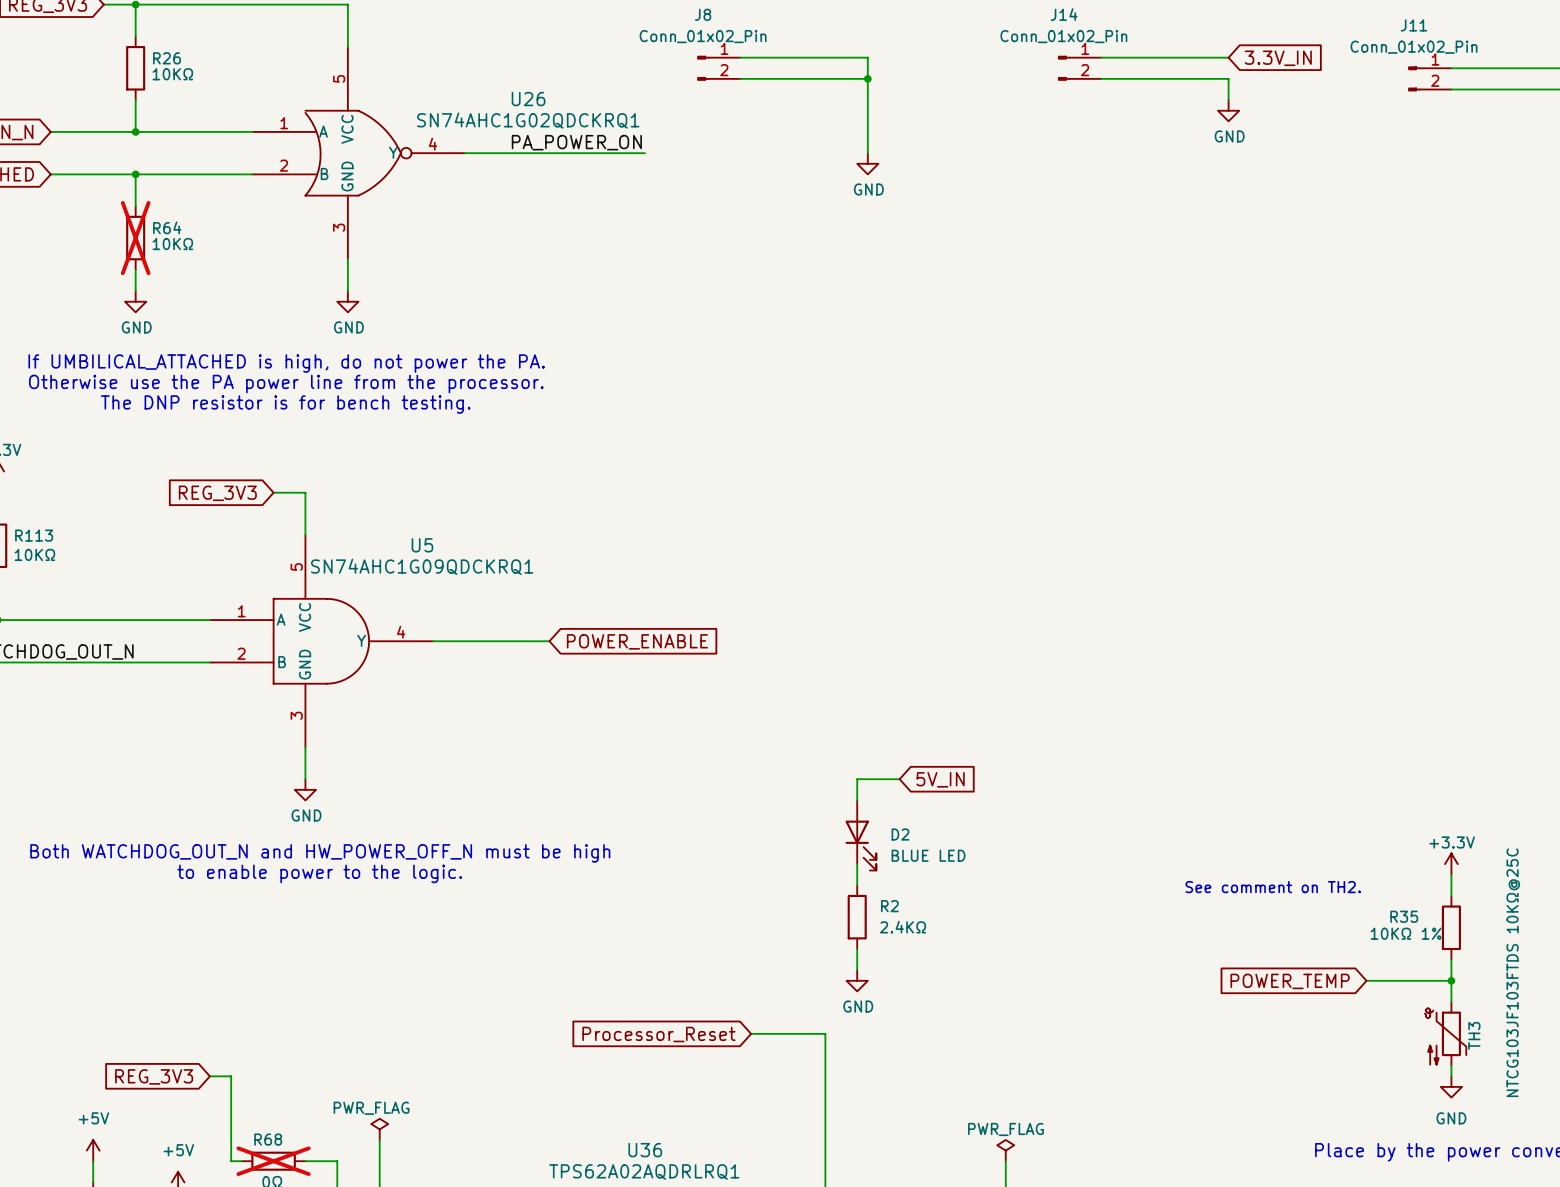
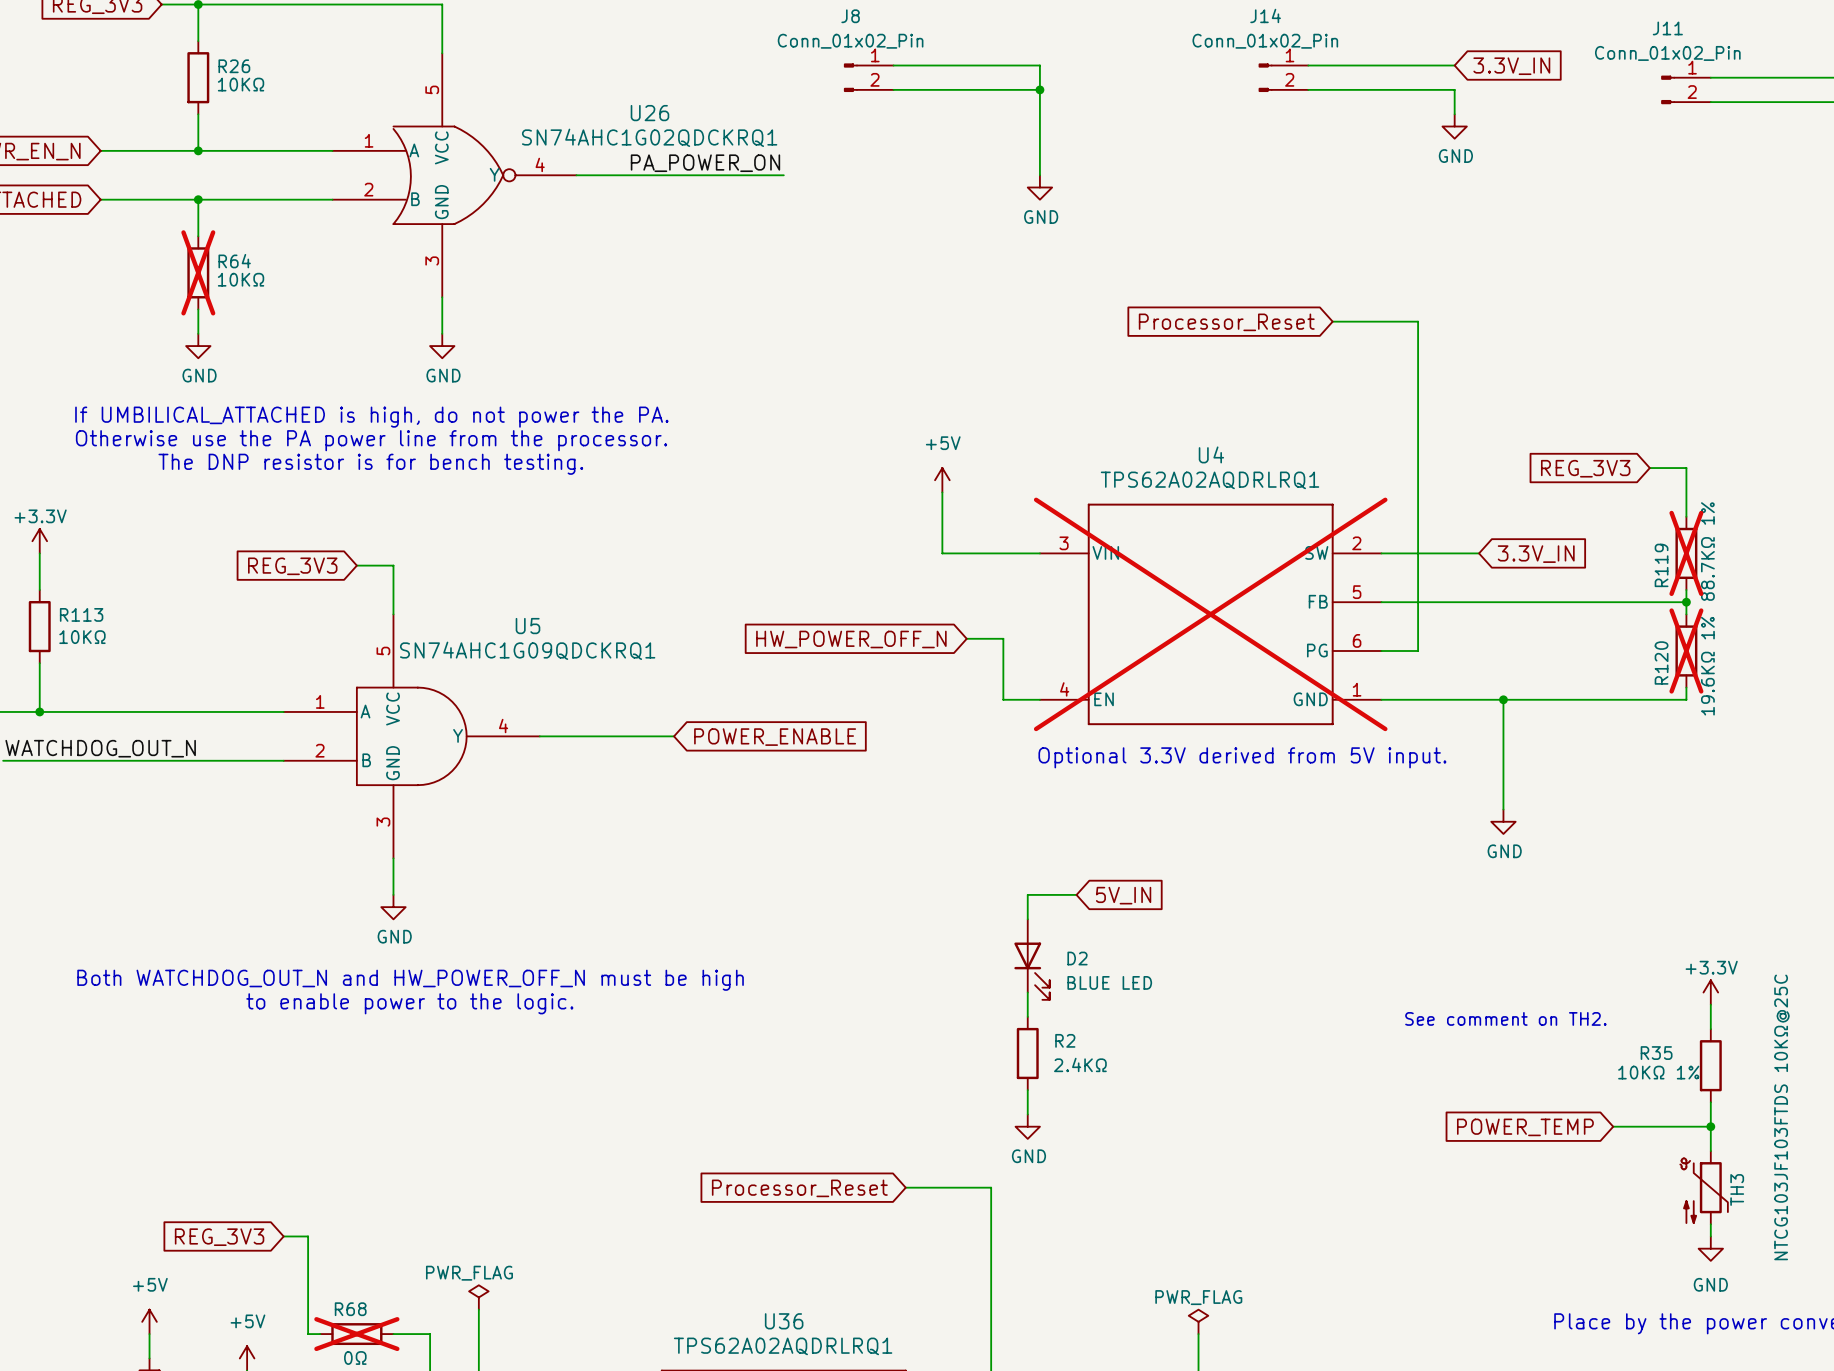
wire: none -> (1332, 321) (1418, 321) (1418, 650) (1381, 650)
global label: none -> Processor_Reset (1226, 322)
wire: none -> (1649, 468) (1686, 468) (1686, 516)
global label: none -> REG_3V3 (1585, 468)
power symbol: none -> +5V (942, 480)
wire: none -> (942, 492) (942, 553) (1039, 553)
wire: none -> (1381, 553) (1479, 553)
global label: none -> 3.3V_IN (1536, 554)
R119: none -> 88.7KΩ 1% (1686, 553)
wire: none -> (1686, 590) (1686, 614)
wire: none -> (1381, 602) (1686, 602)
junction: none -> (1686, 602)
U4: none -> TPS62A02AQDRLRQ1 (1210, 614)
global label: none -> HW_POWER_OFF_N (851, 639)
wire: none -> (966, 638) (1003, 638) (1003, 699) (1039, 699)
R120: none -> 19.6KΩ 1% (1686, 650)
wire: none -> (1686, 687) (1686, 699) (1381, 699)
wire: none -> (1503, 699) (1503, 809)
junction: none -> (1503, 699)
text: none -> Optional 3.3V derived from 5V input. (1242, 757)
power symbol: none -> GND (1503, 821)

